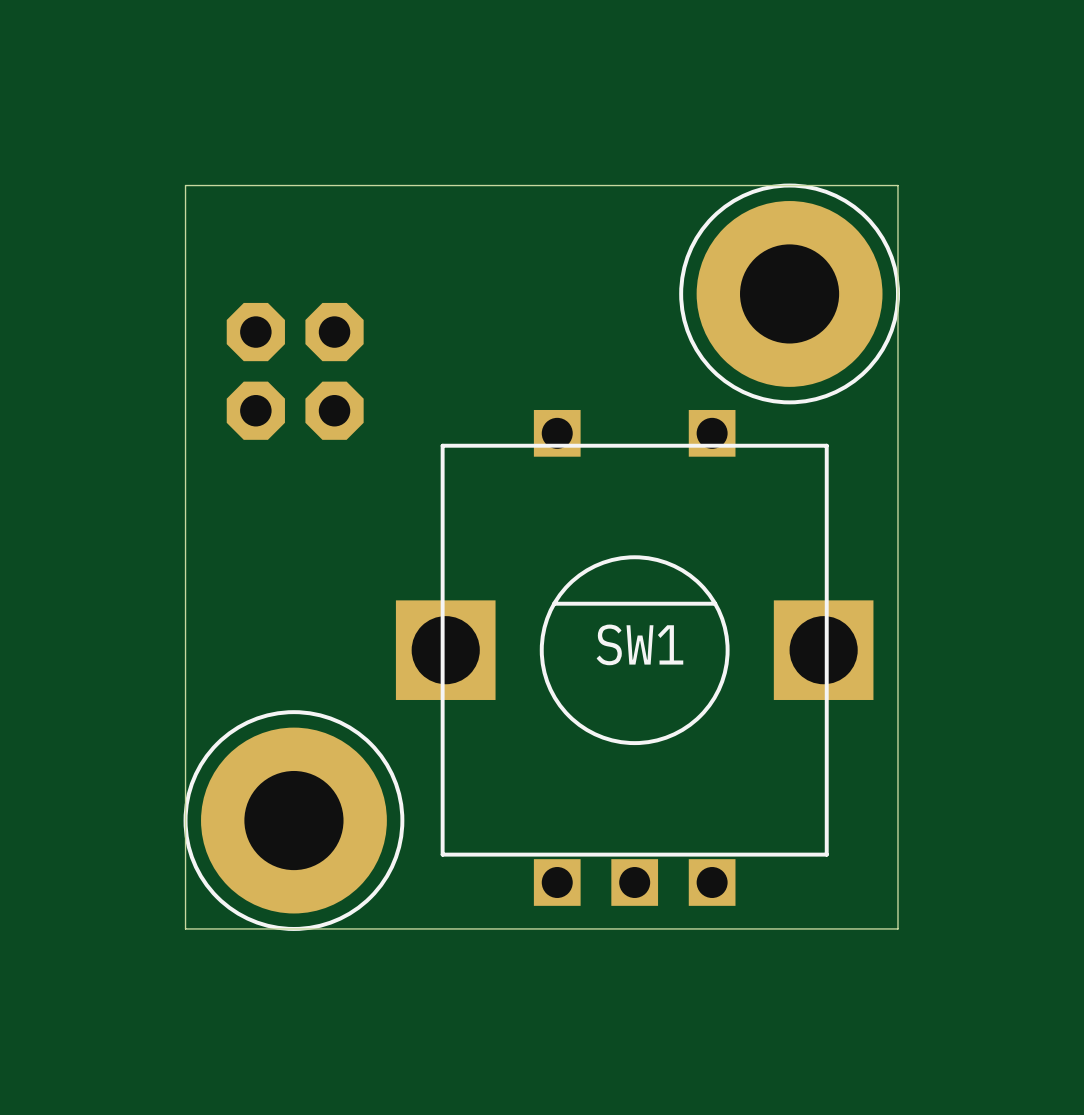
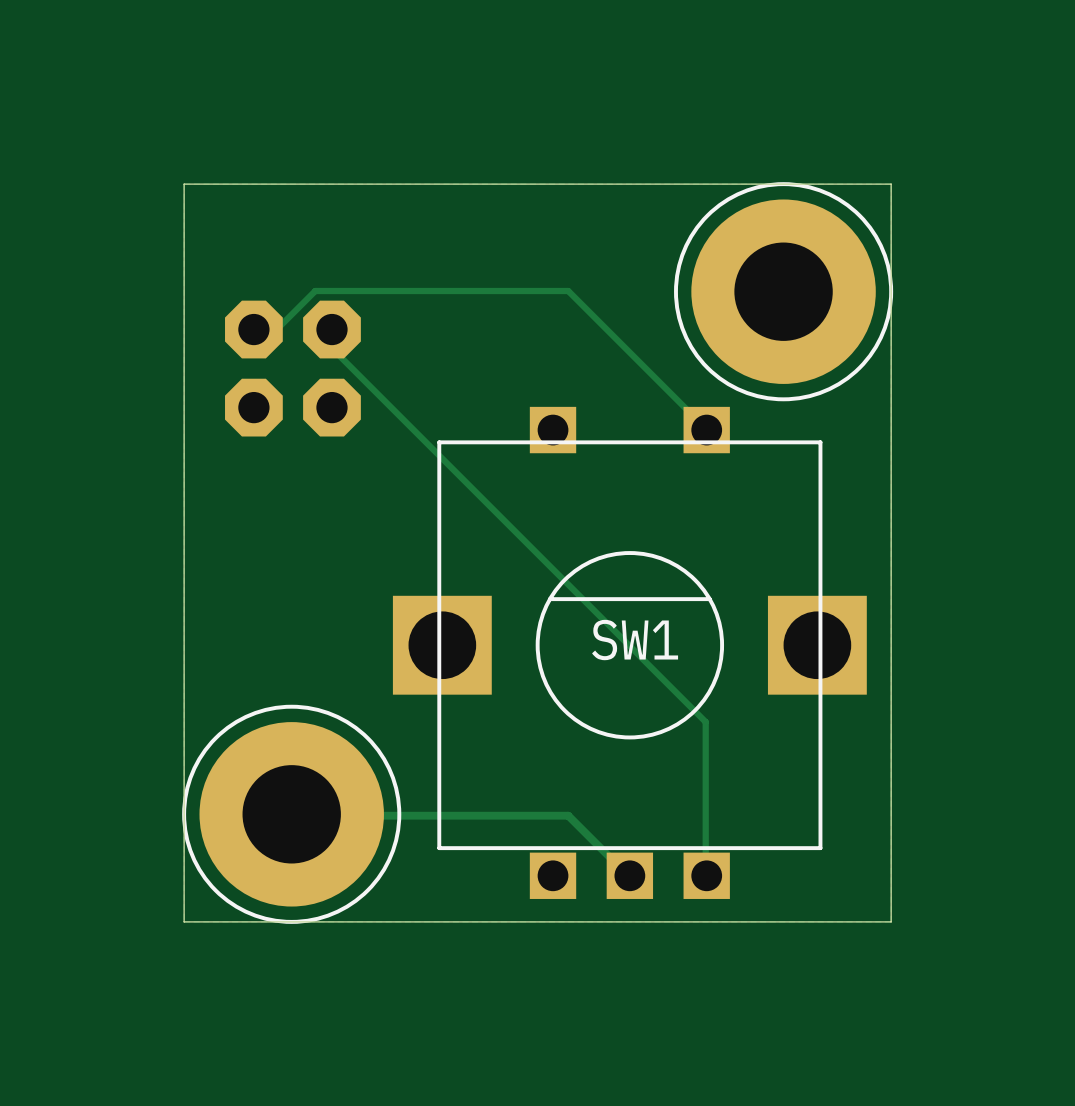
track: none -> (253, 329) (277, 328) (315, 291) (568, 291) (706, 430)
track: none -> (331, 329) (334, 331) (334, 350) (705, 722) (706, 875)
track: none -> (291, 814) (568, 815) (629, 875)

